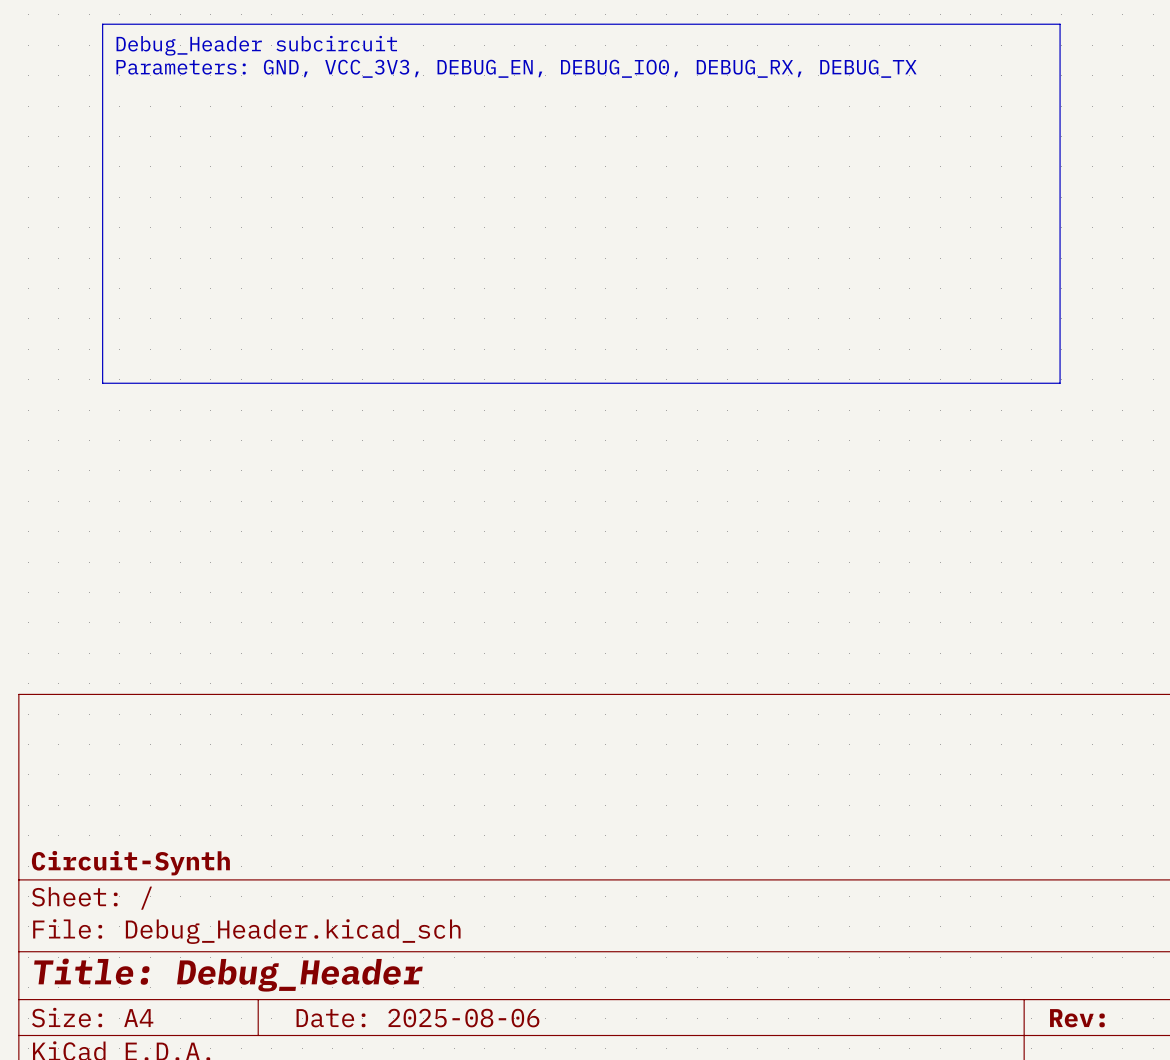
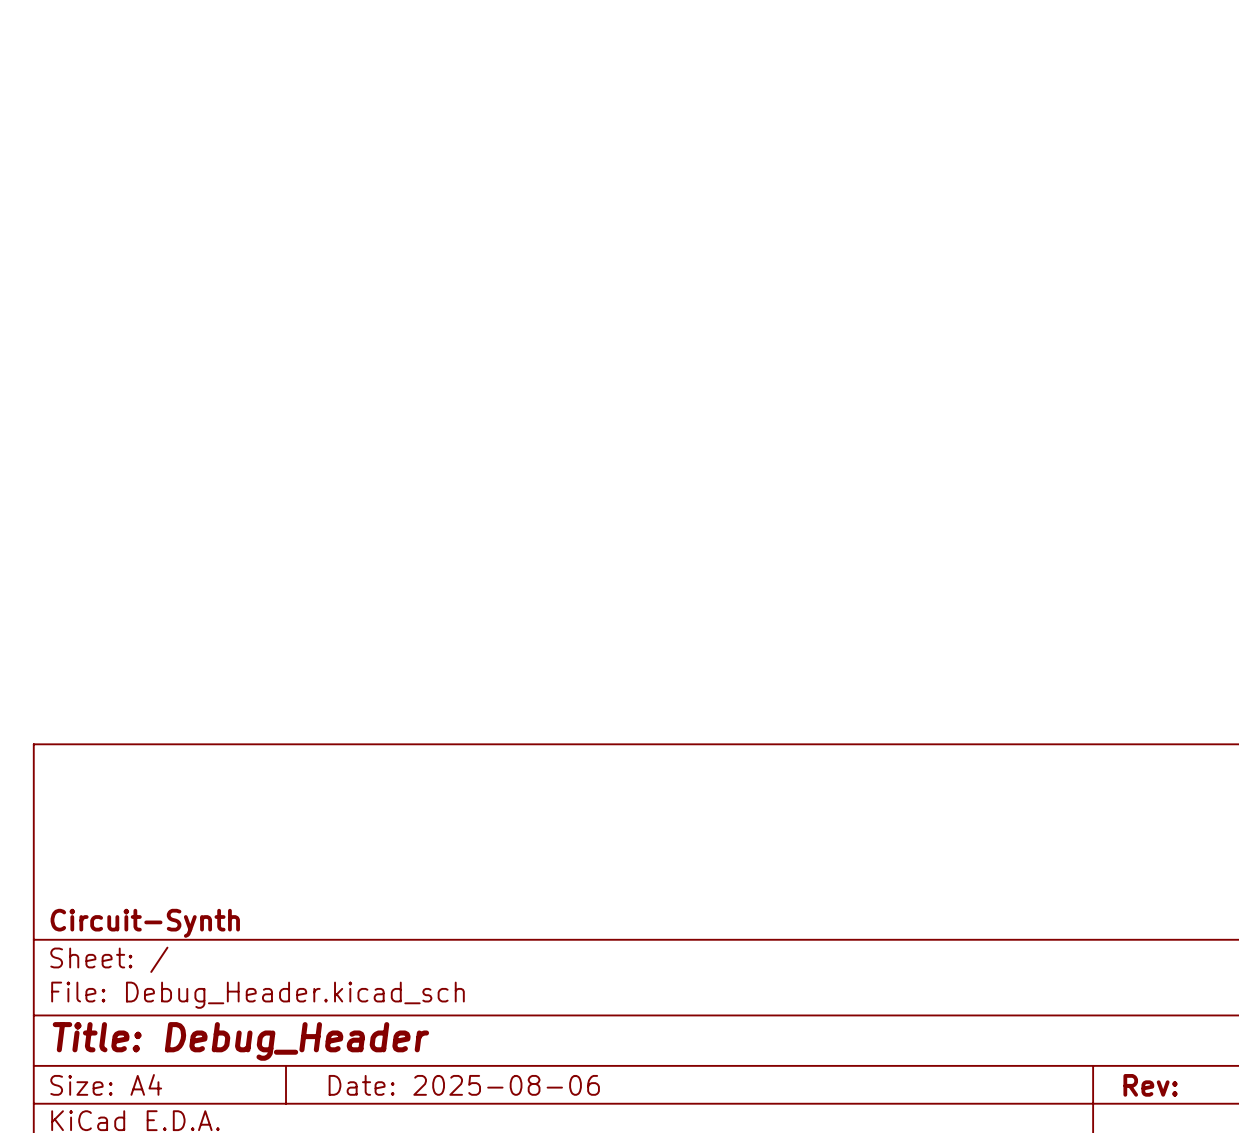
line: (102, 24) (1060, 24) (1060, 383) (102, 383) (102, 24) -> none
text: Debug_Header subcircuit (256, 45) -> none
text: Parameters: GND, VCC_3V3, DEBUG_EN, DEBUG_IO0, DEBUG_RX, DEBUG_TX (516, 68) -> none

